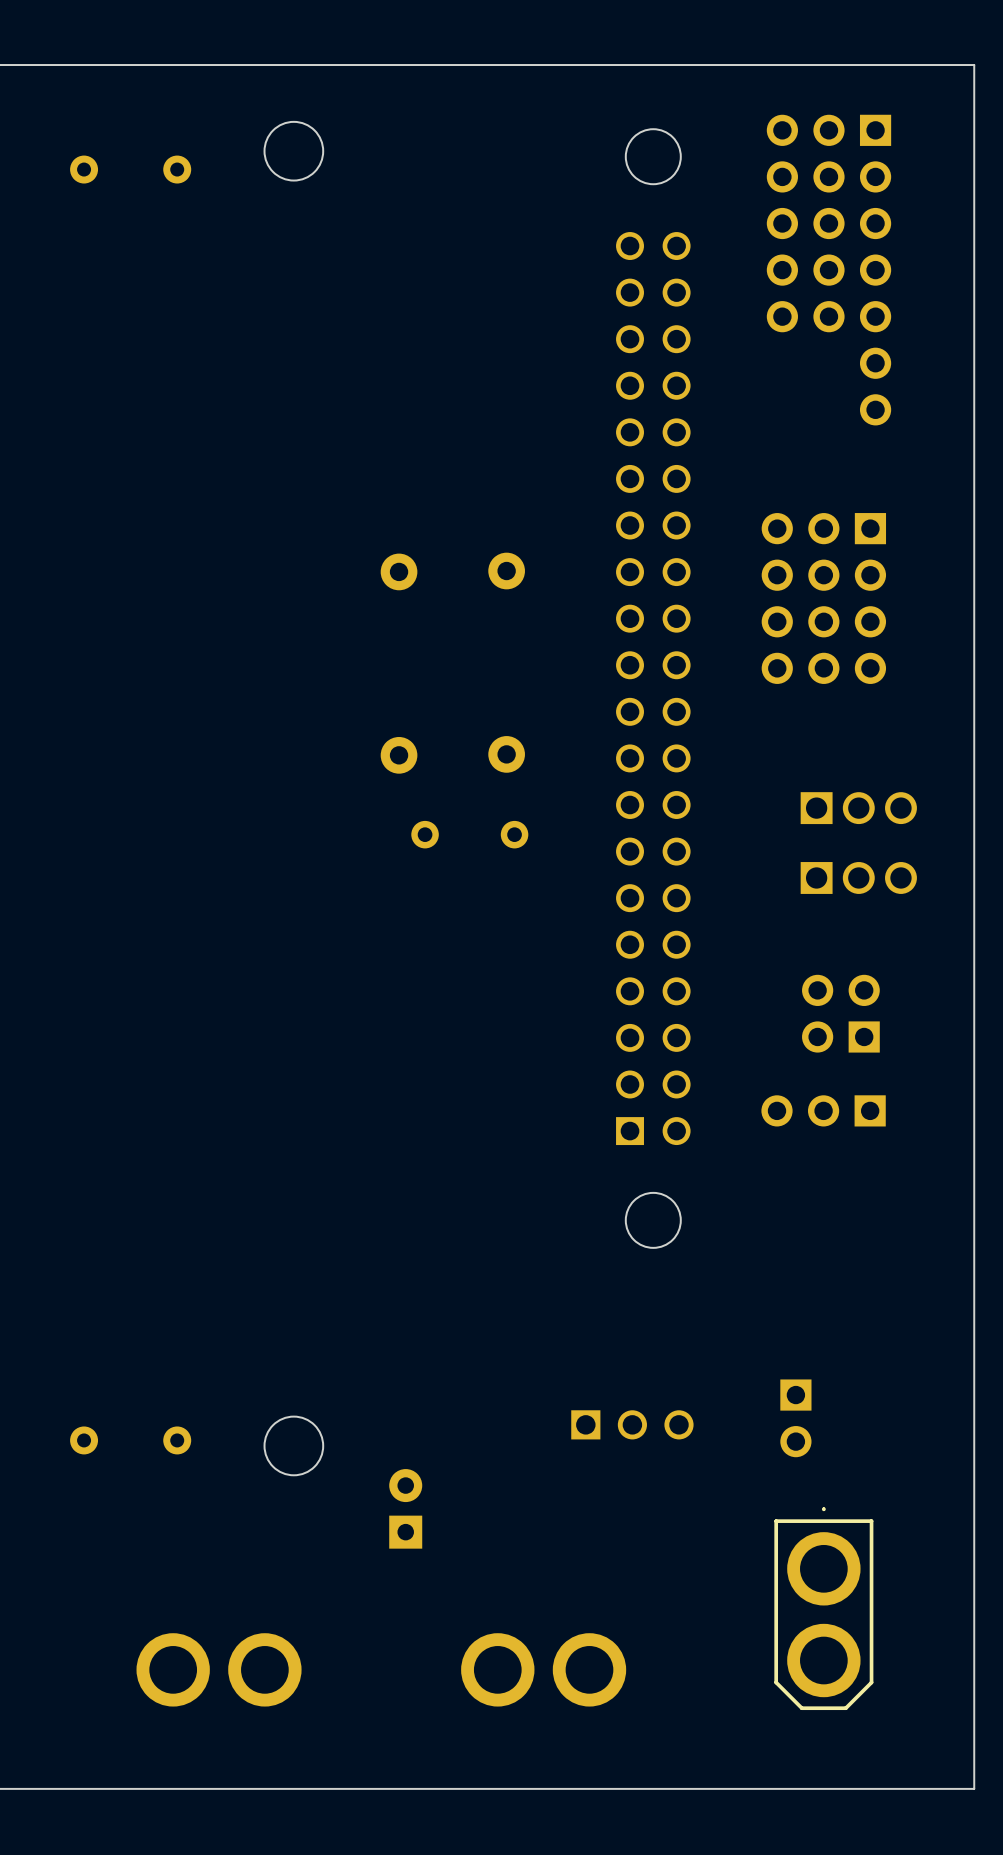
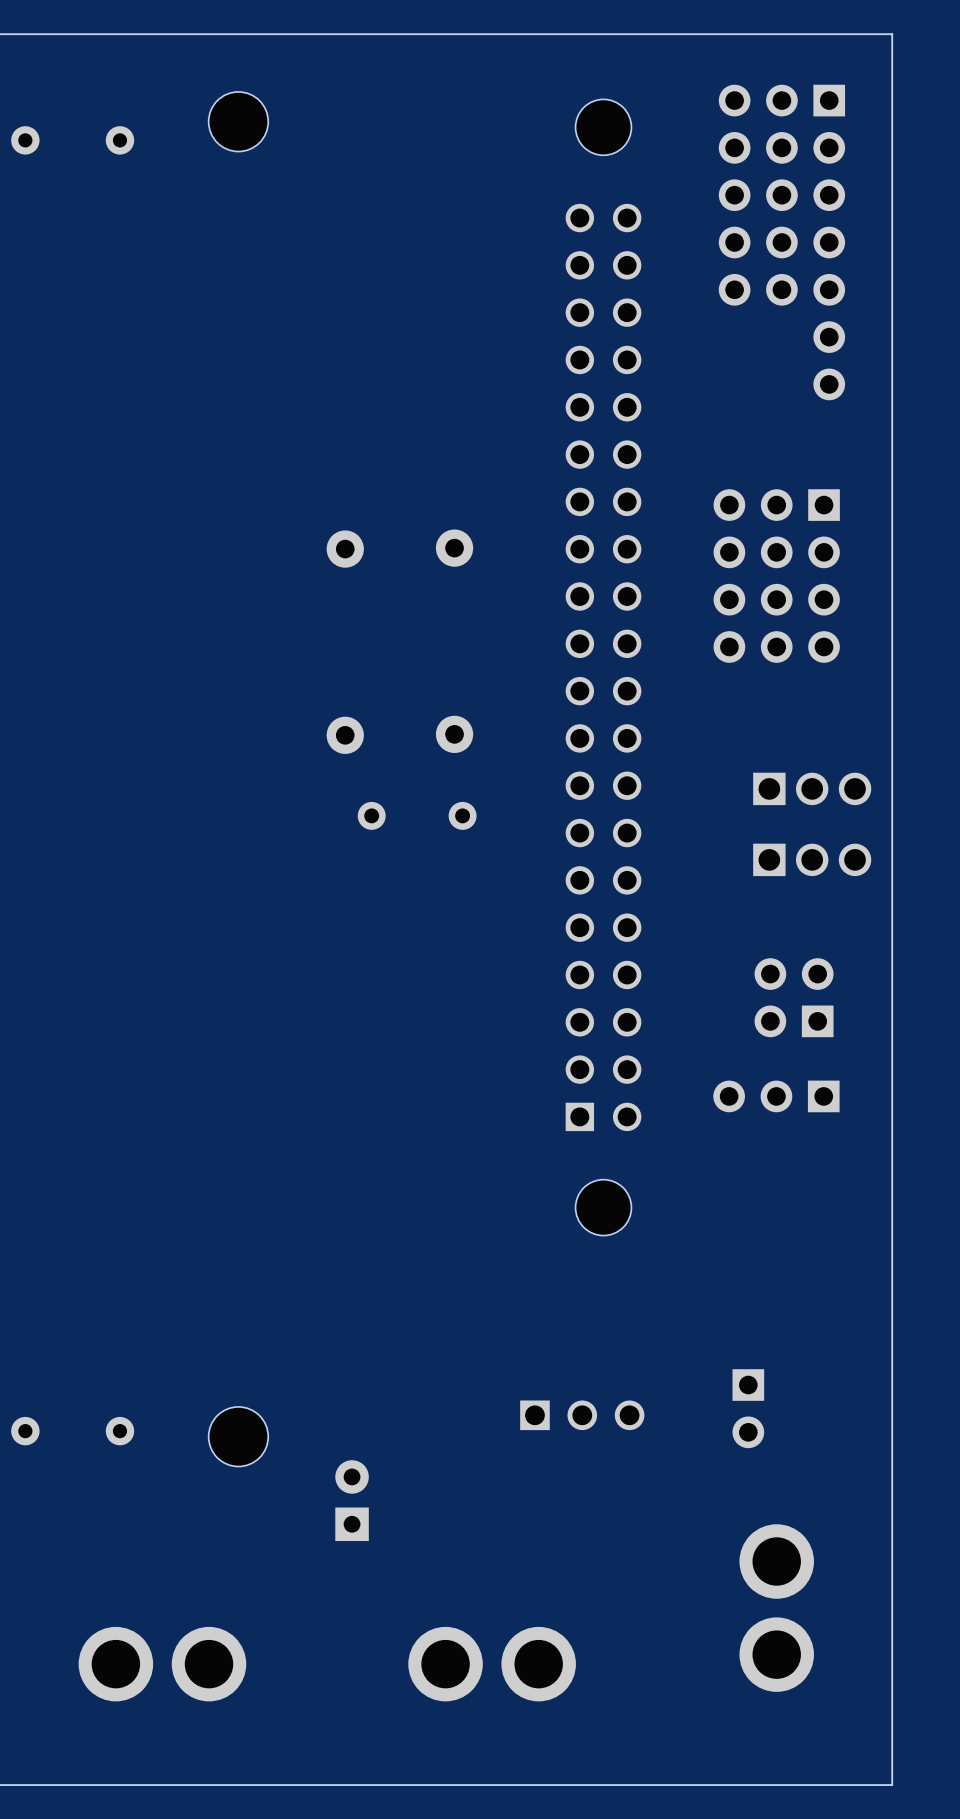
board edge: (937, 65) (974, 65) (974, 1788) (937, 1788) -> (892, 34) (892, 1785)
part side: bottom (823, 1608) -> top (776, 1608)

